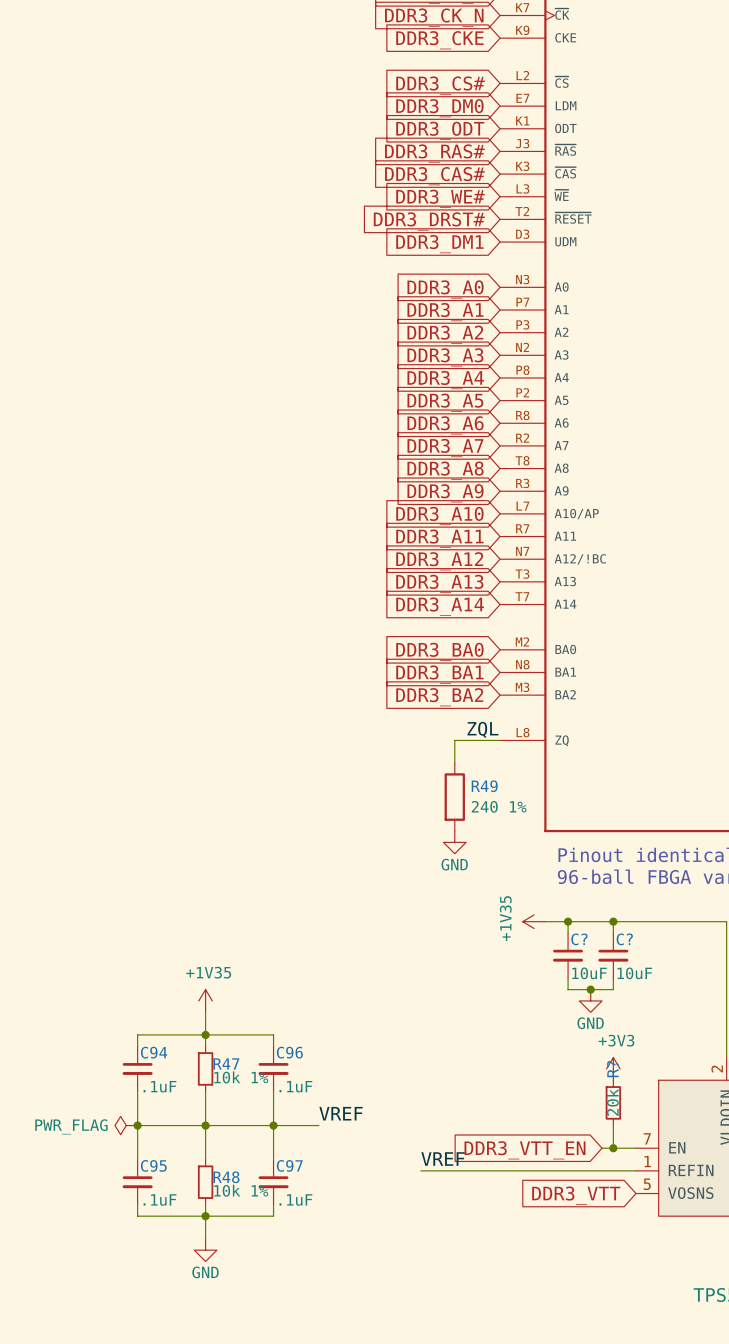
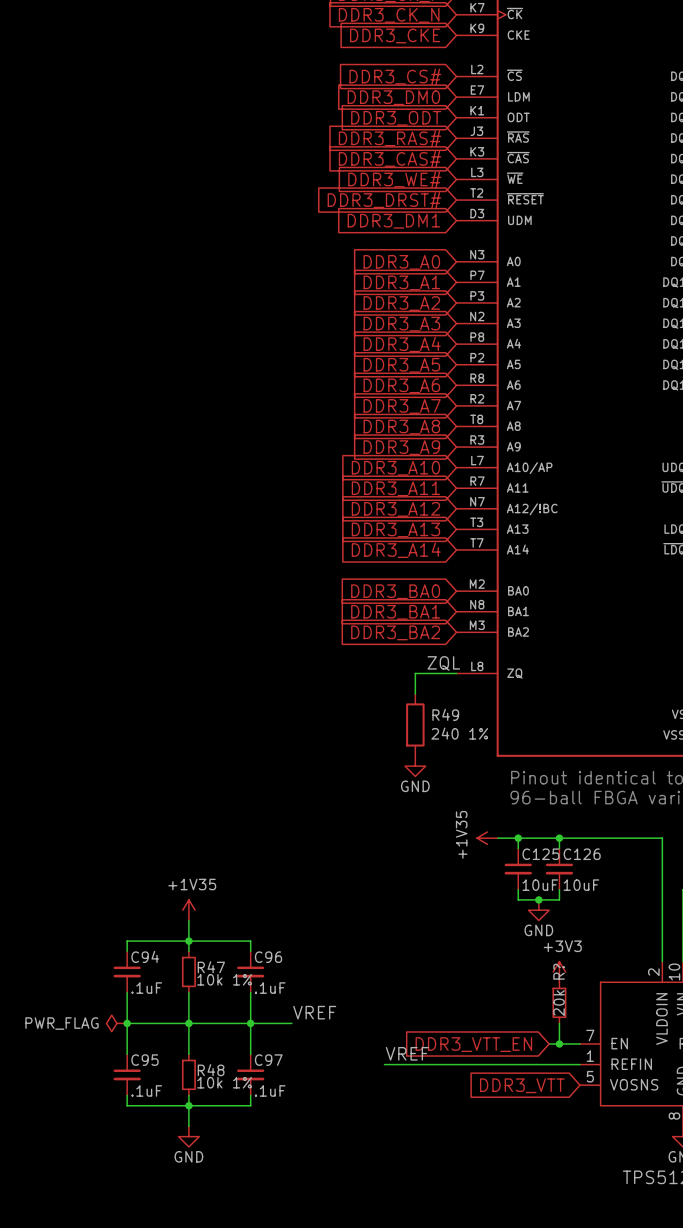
C? name: C? (579, 939) -> C125 (540, 854)
C? name: C? (624, 939) -> C126 (582, 854)

